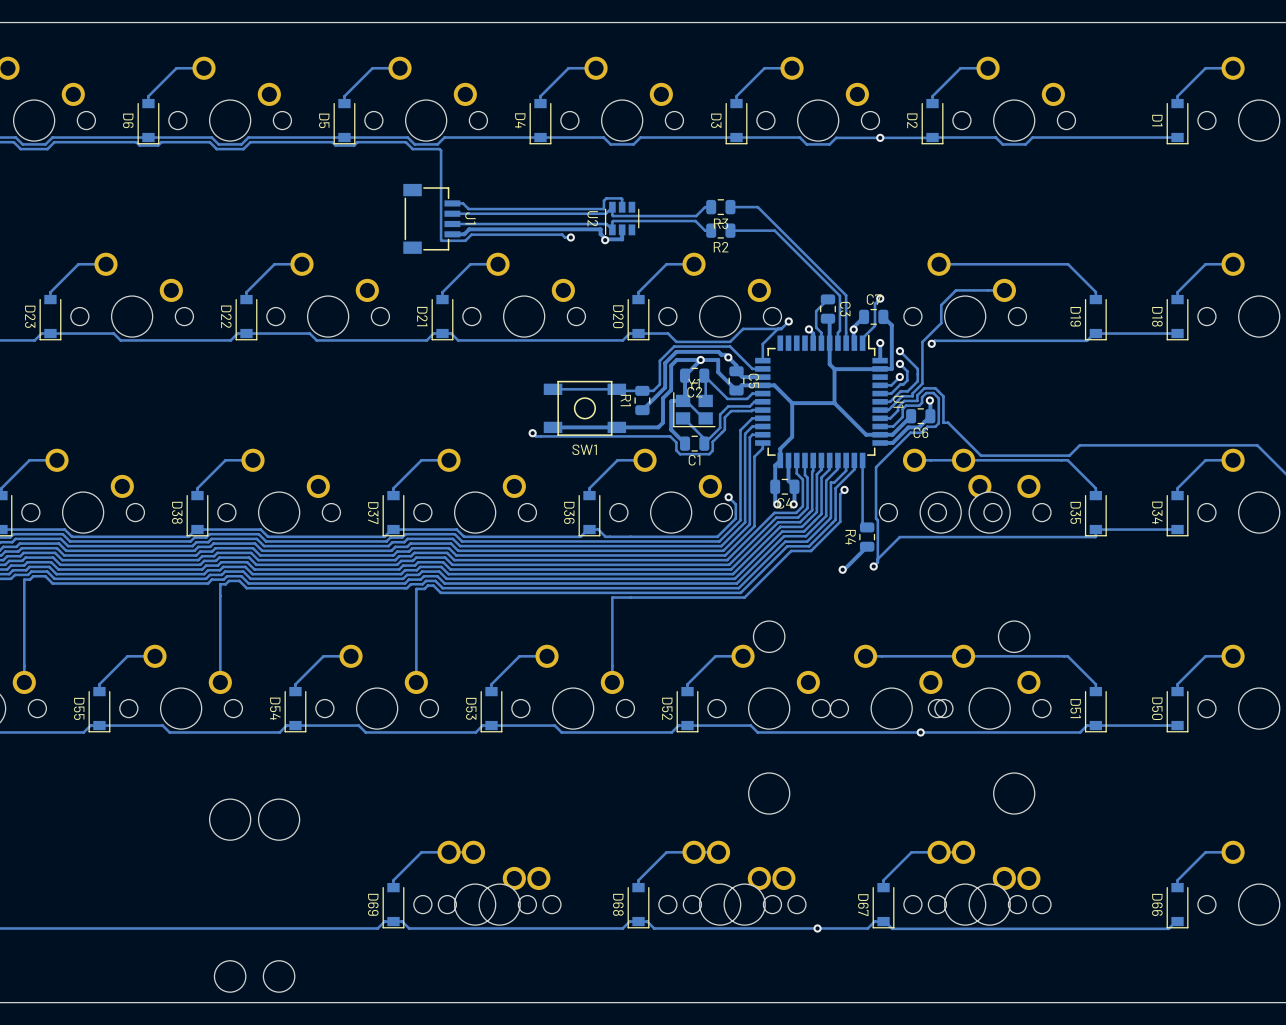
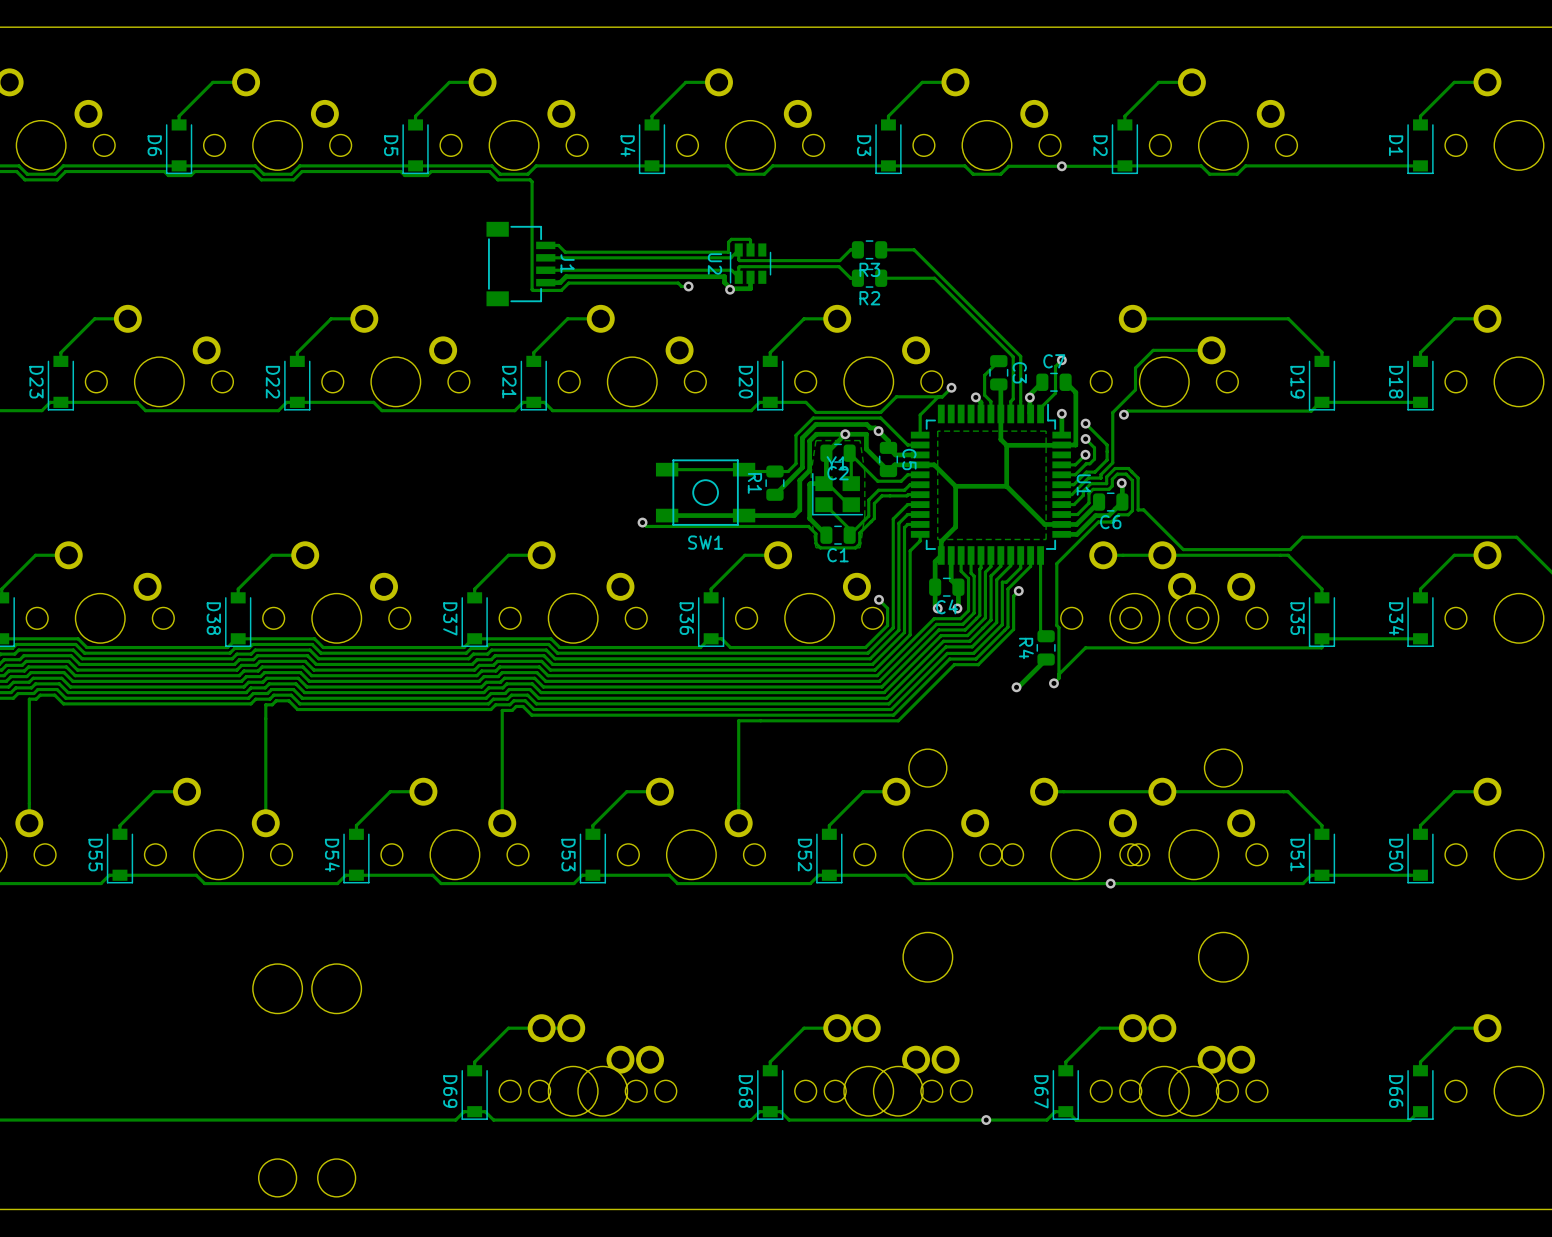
zone outline: none -> (1046, 431) (937, 431) (937, 539) (1046, 539) (1046, 431)
zone outline: none -> (860, 440) (815, 440) (811, 472) (811, 516) (815, 547) (860, 547) (864, 516) (864, 472) (860, 440)

